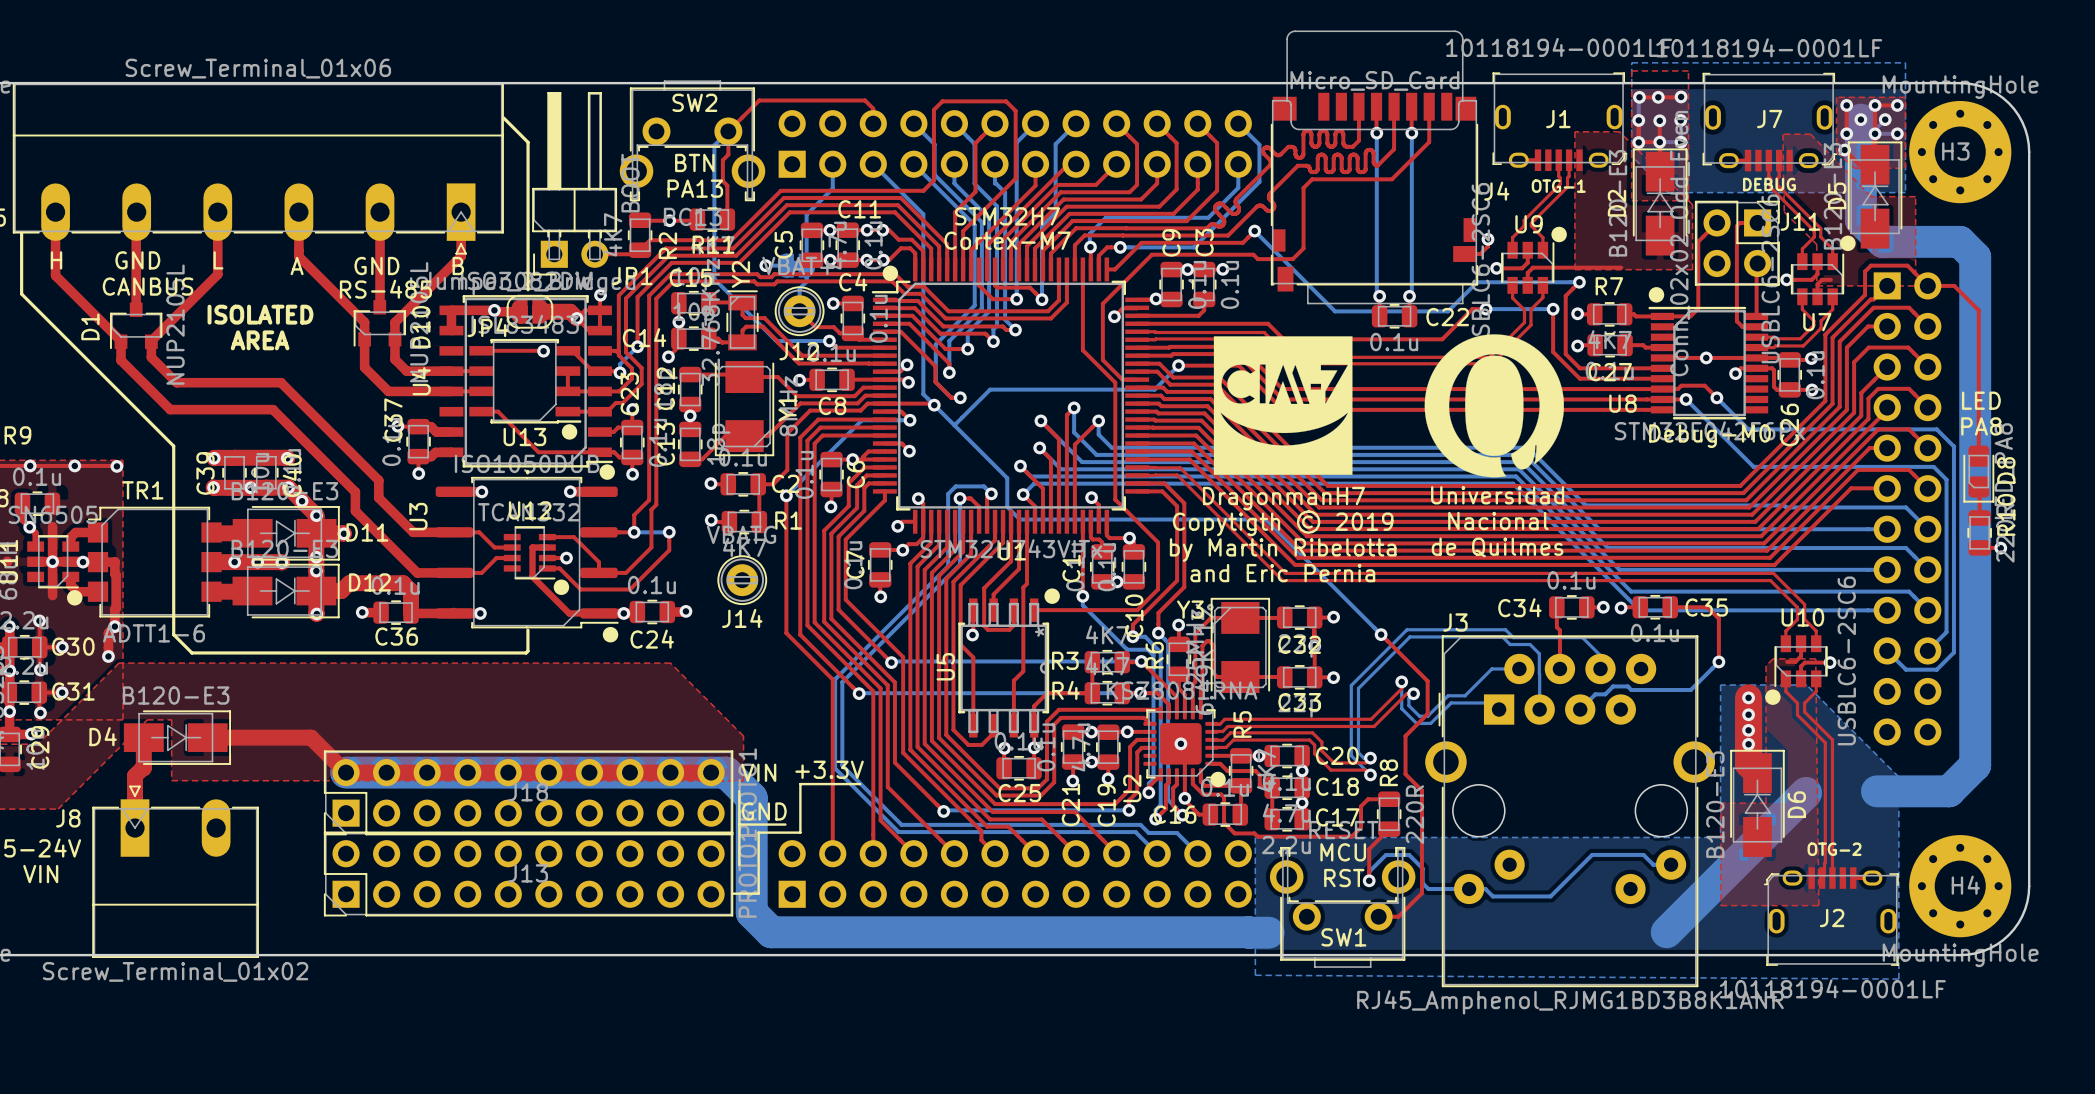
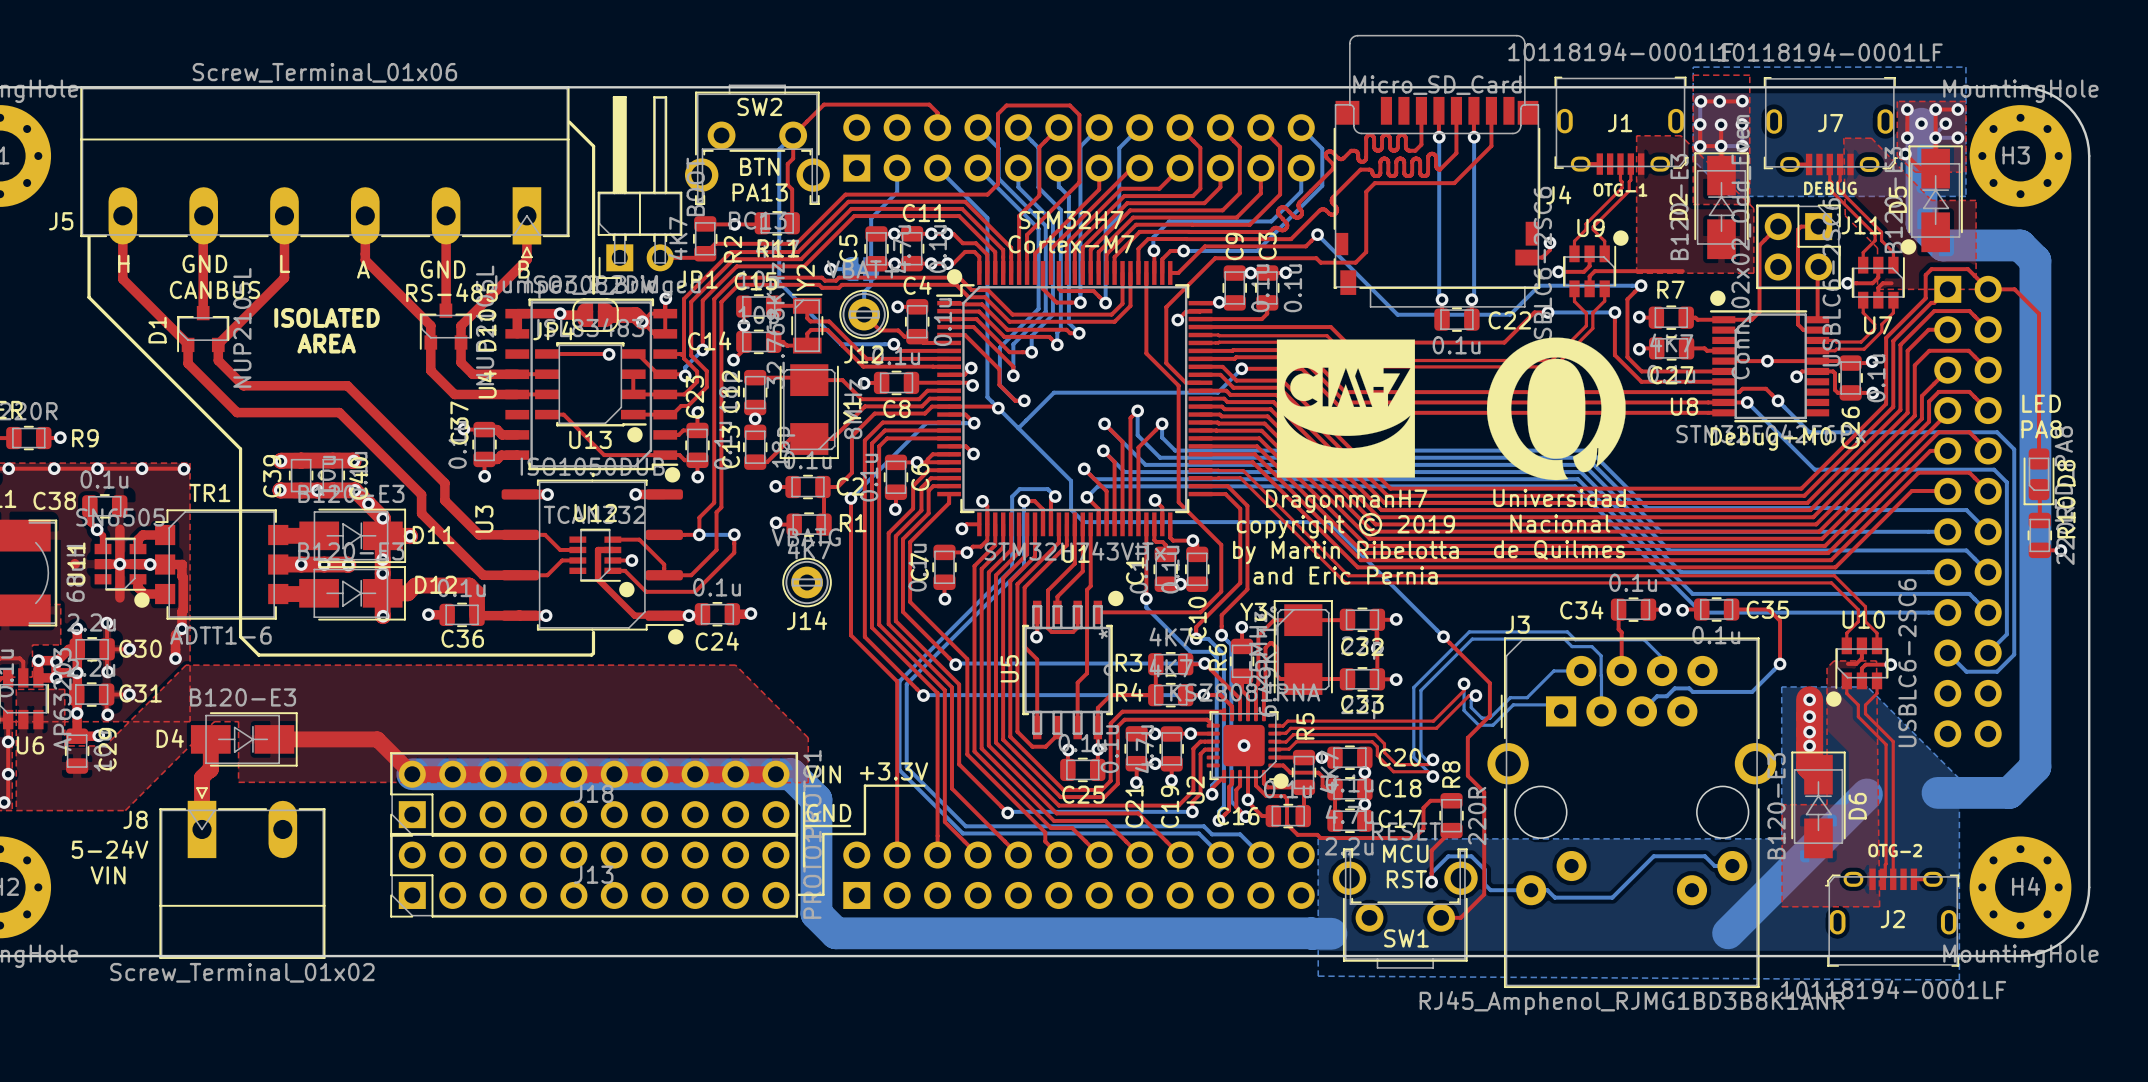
text: Copytigth © 2019 (1283, 523) -> copyright © 2019 (1345, 525)

